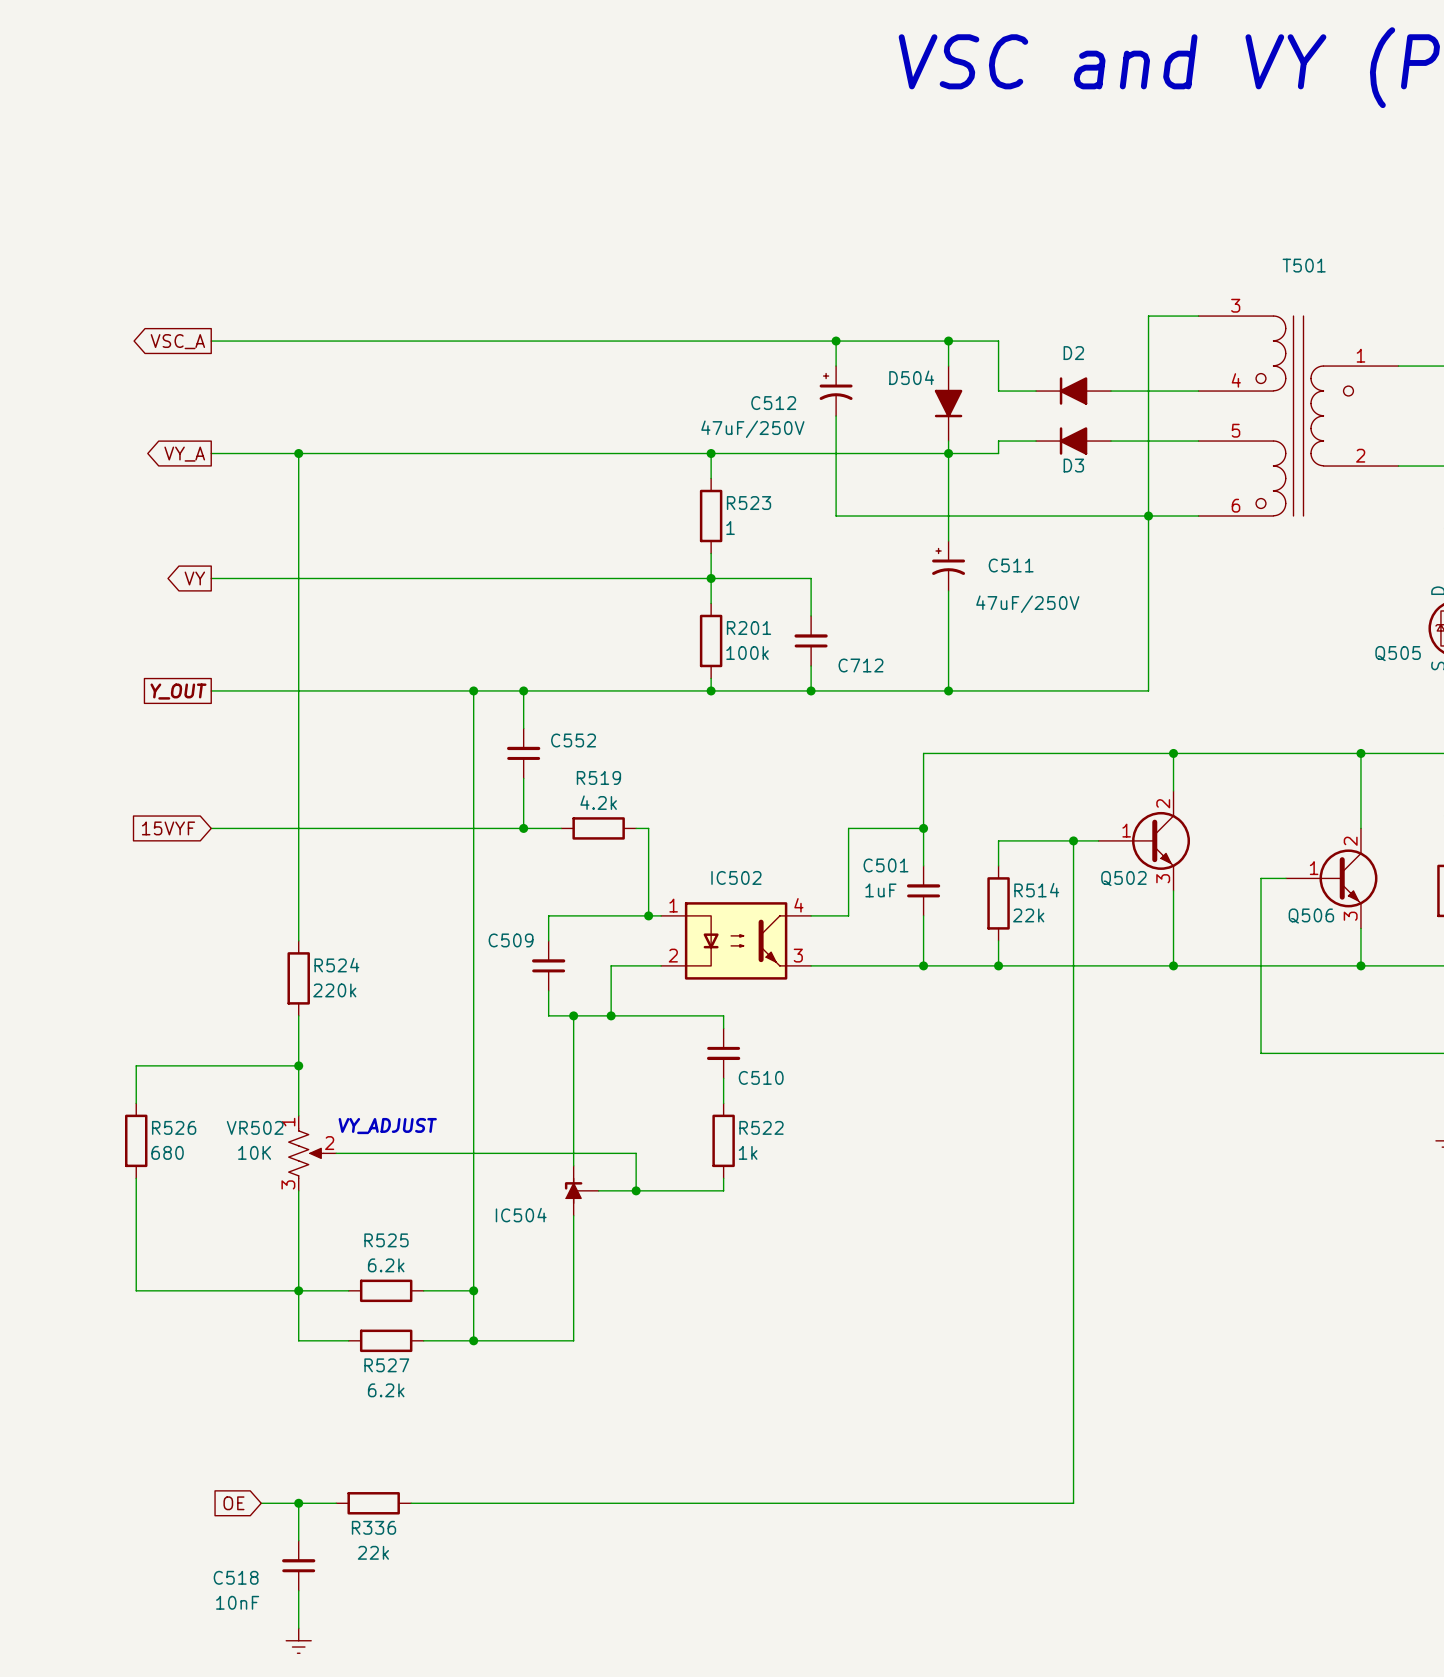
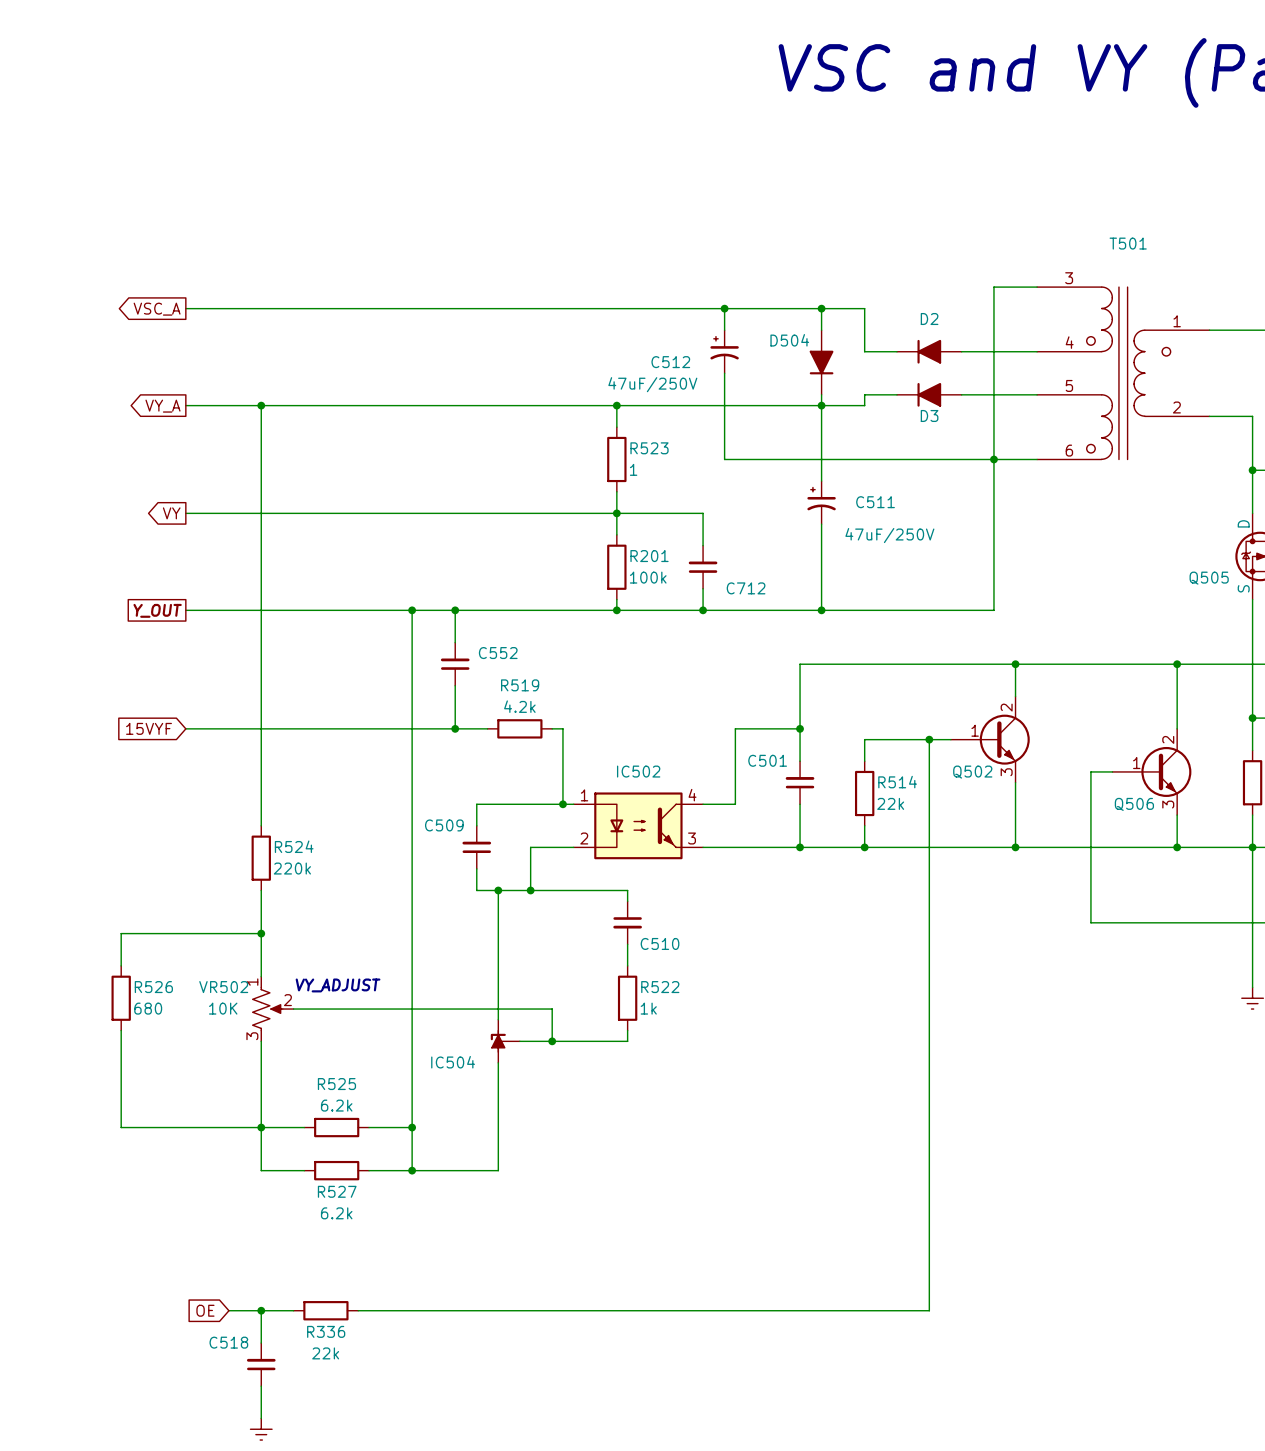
C501 value: 1uF (880, 890) -> none
C518 name position: C518 (236, 1577) -> C518 (228, 1342)
C518 value: 10nF (237, 1602) -> none

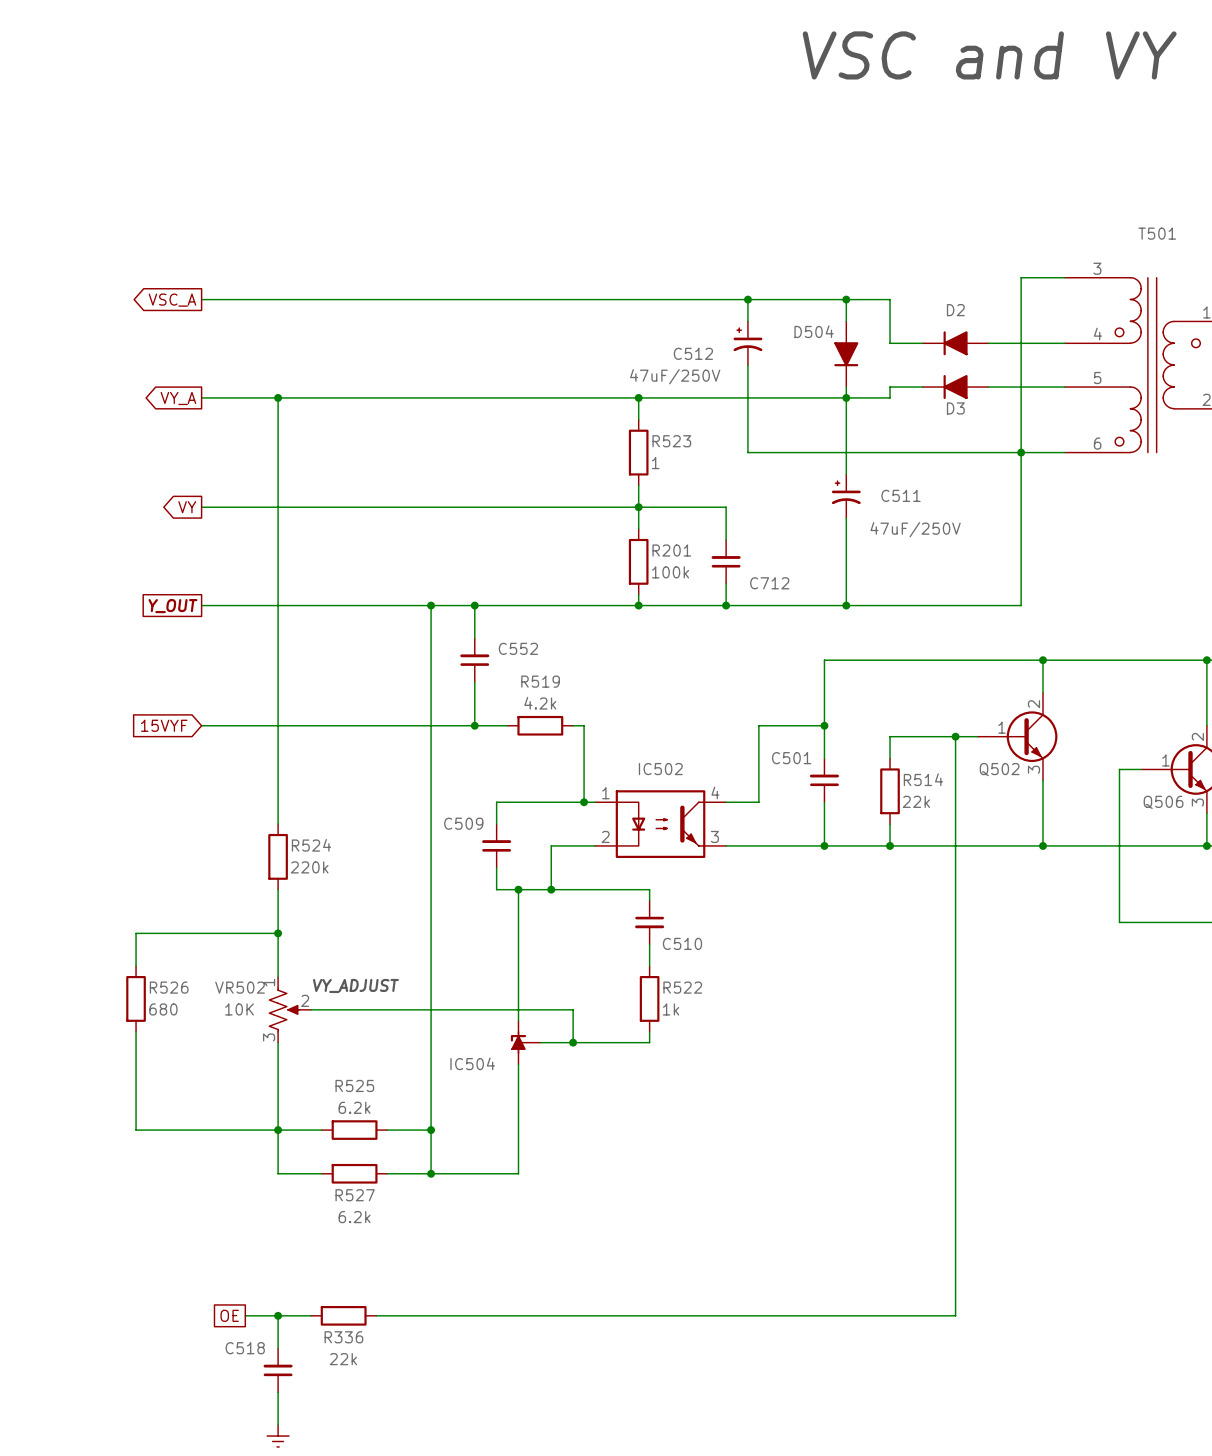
global label shape: input (205, 1310) -> passive (229, 1315)

